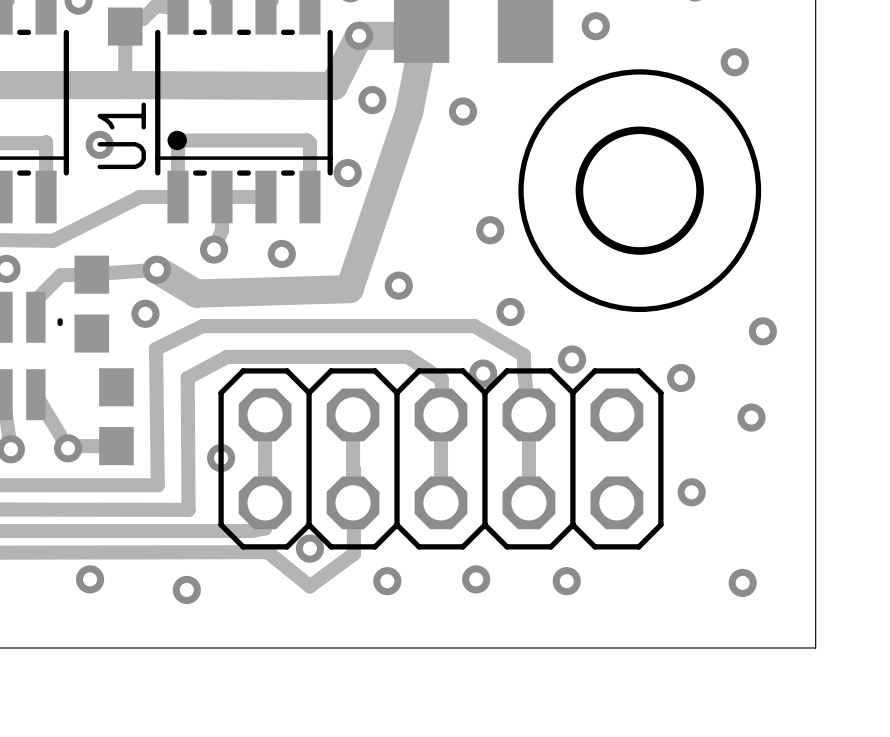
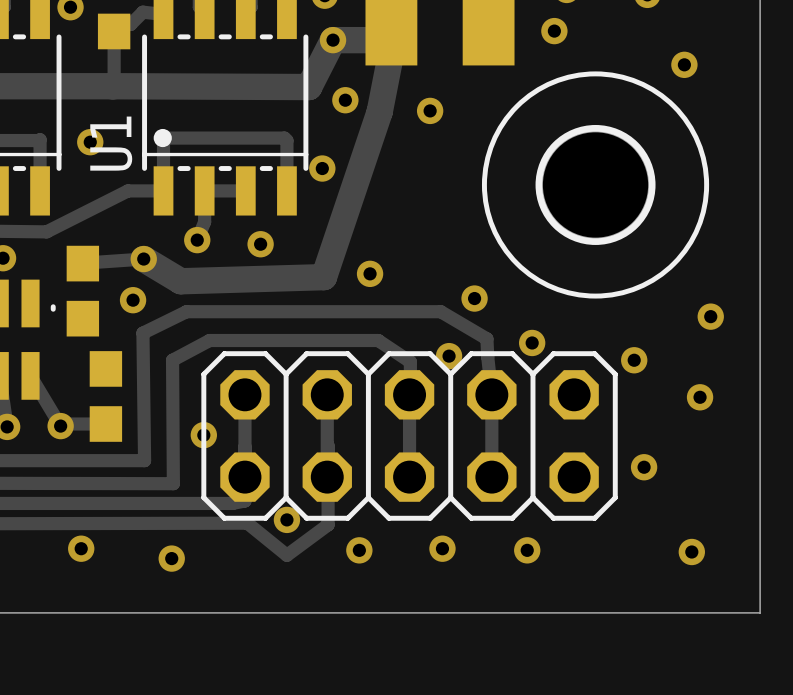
via: (490, 230) -> none
track: (91, 275) (61, 275) (35, 300) (35, 317) -> none

